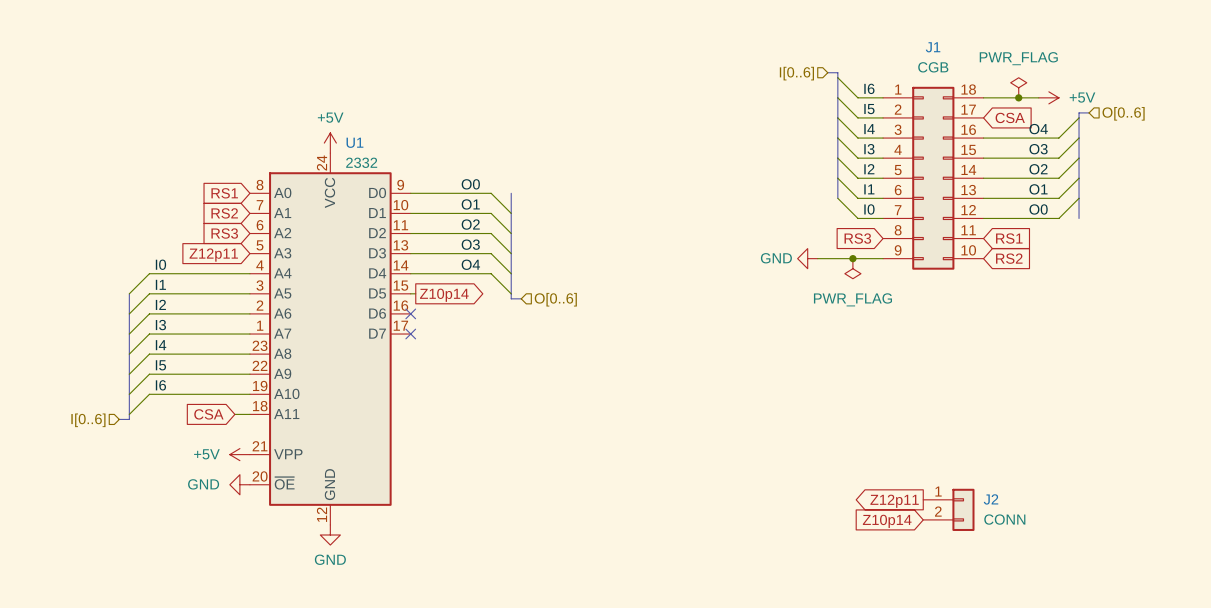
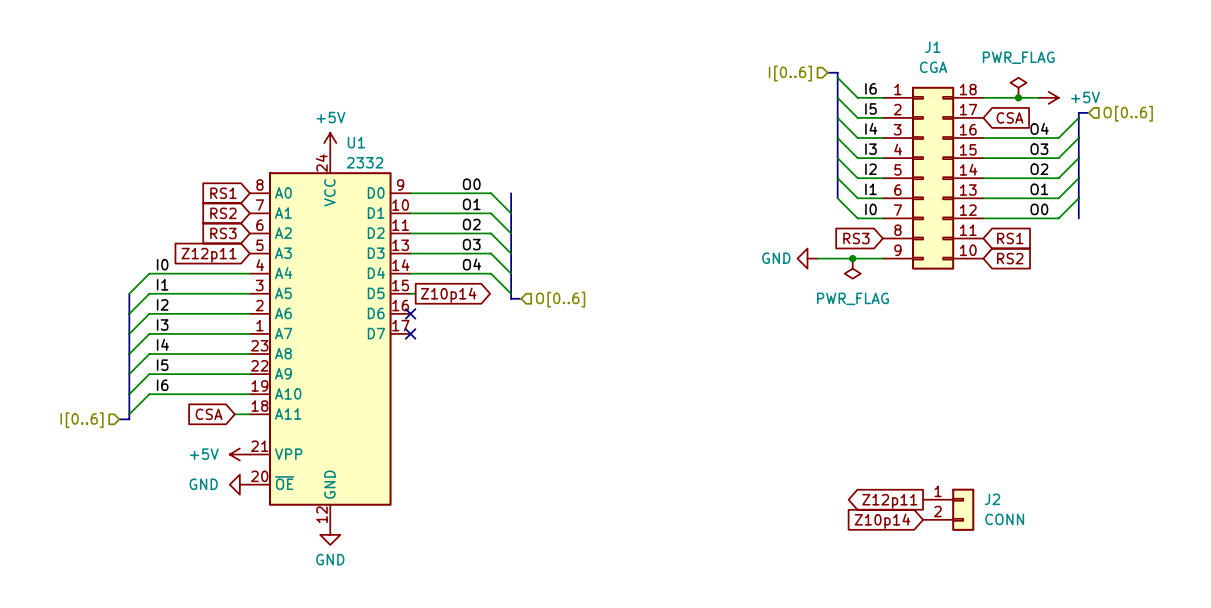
J1 value: CGB (933, 67) -> CGA (933, 67)

